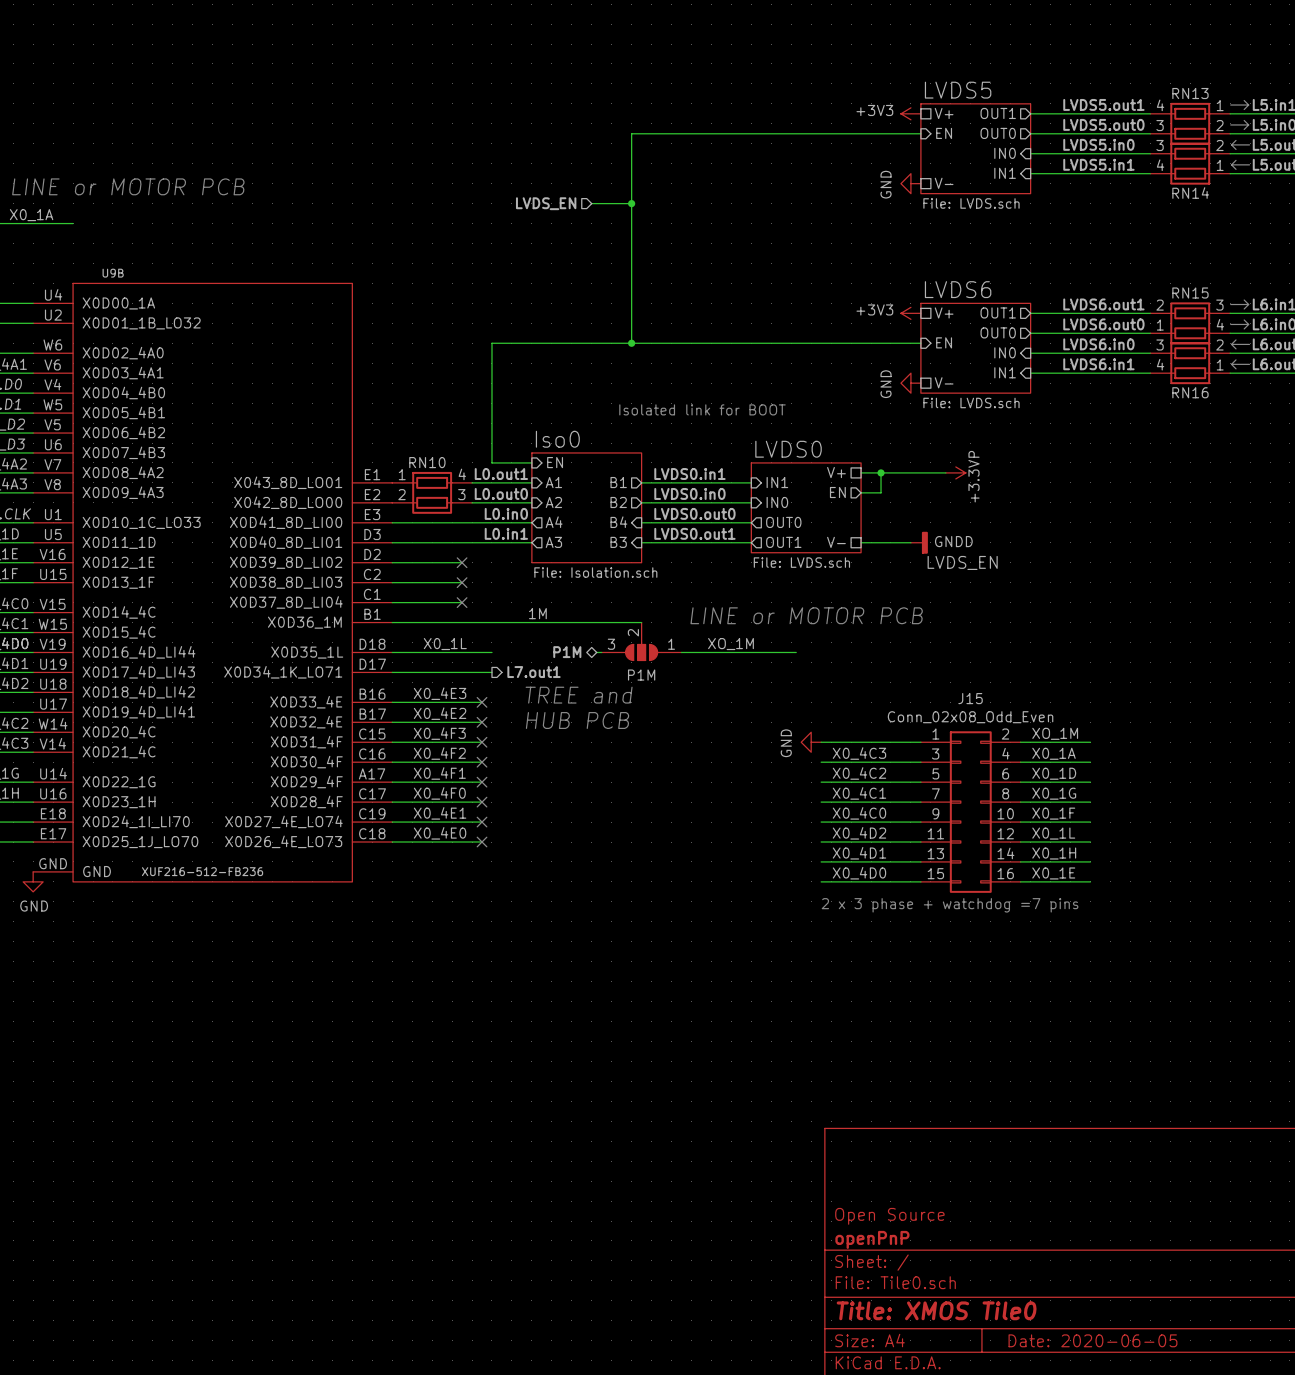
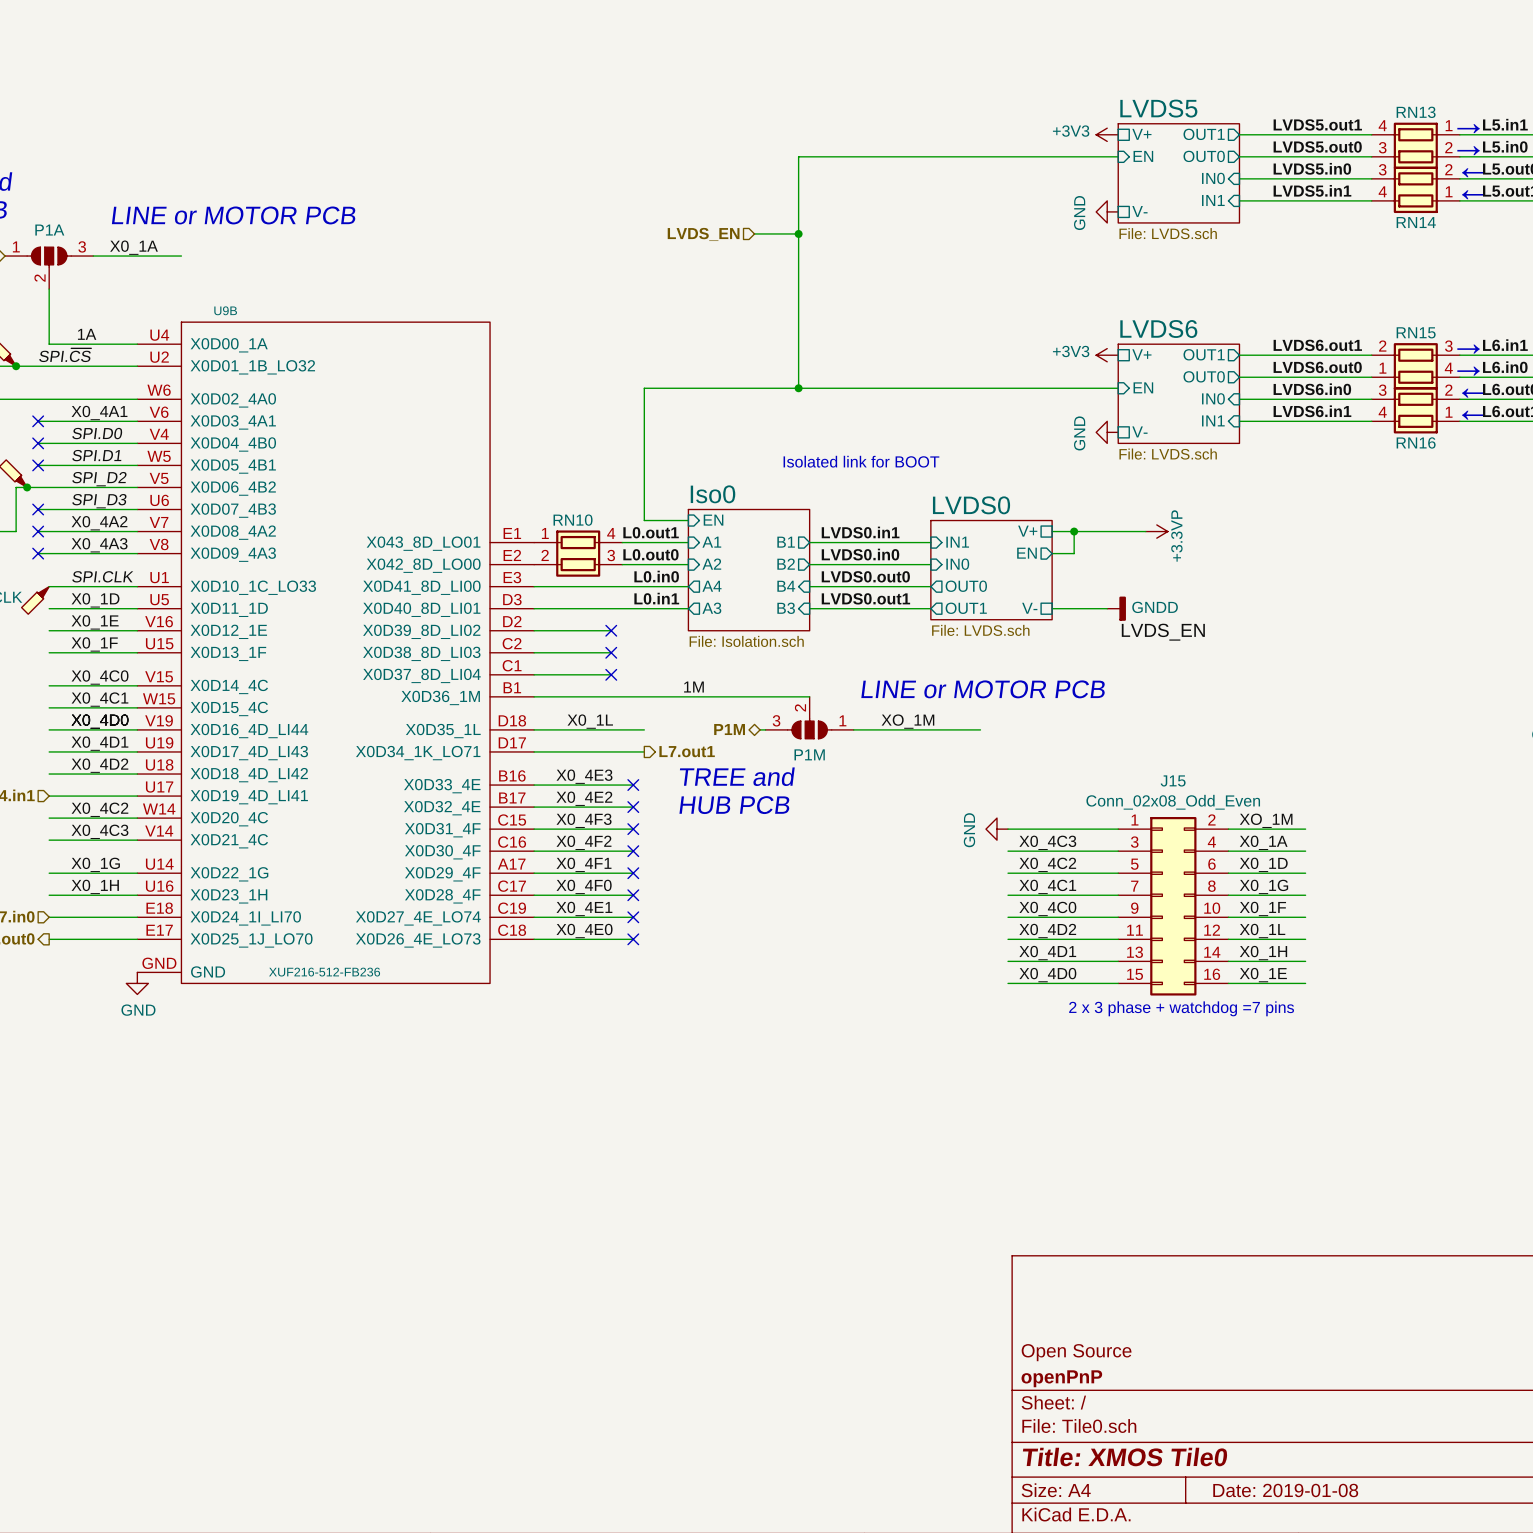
title block: Date: 2020-06-05 (1092, 1340) -> Date: 2019-01-08 (1285, 1490)

